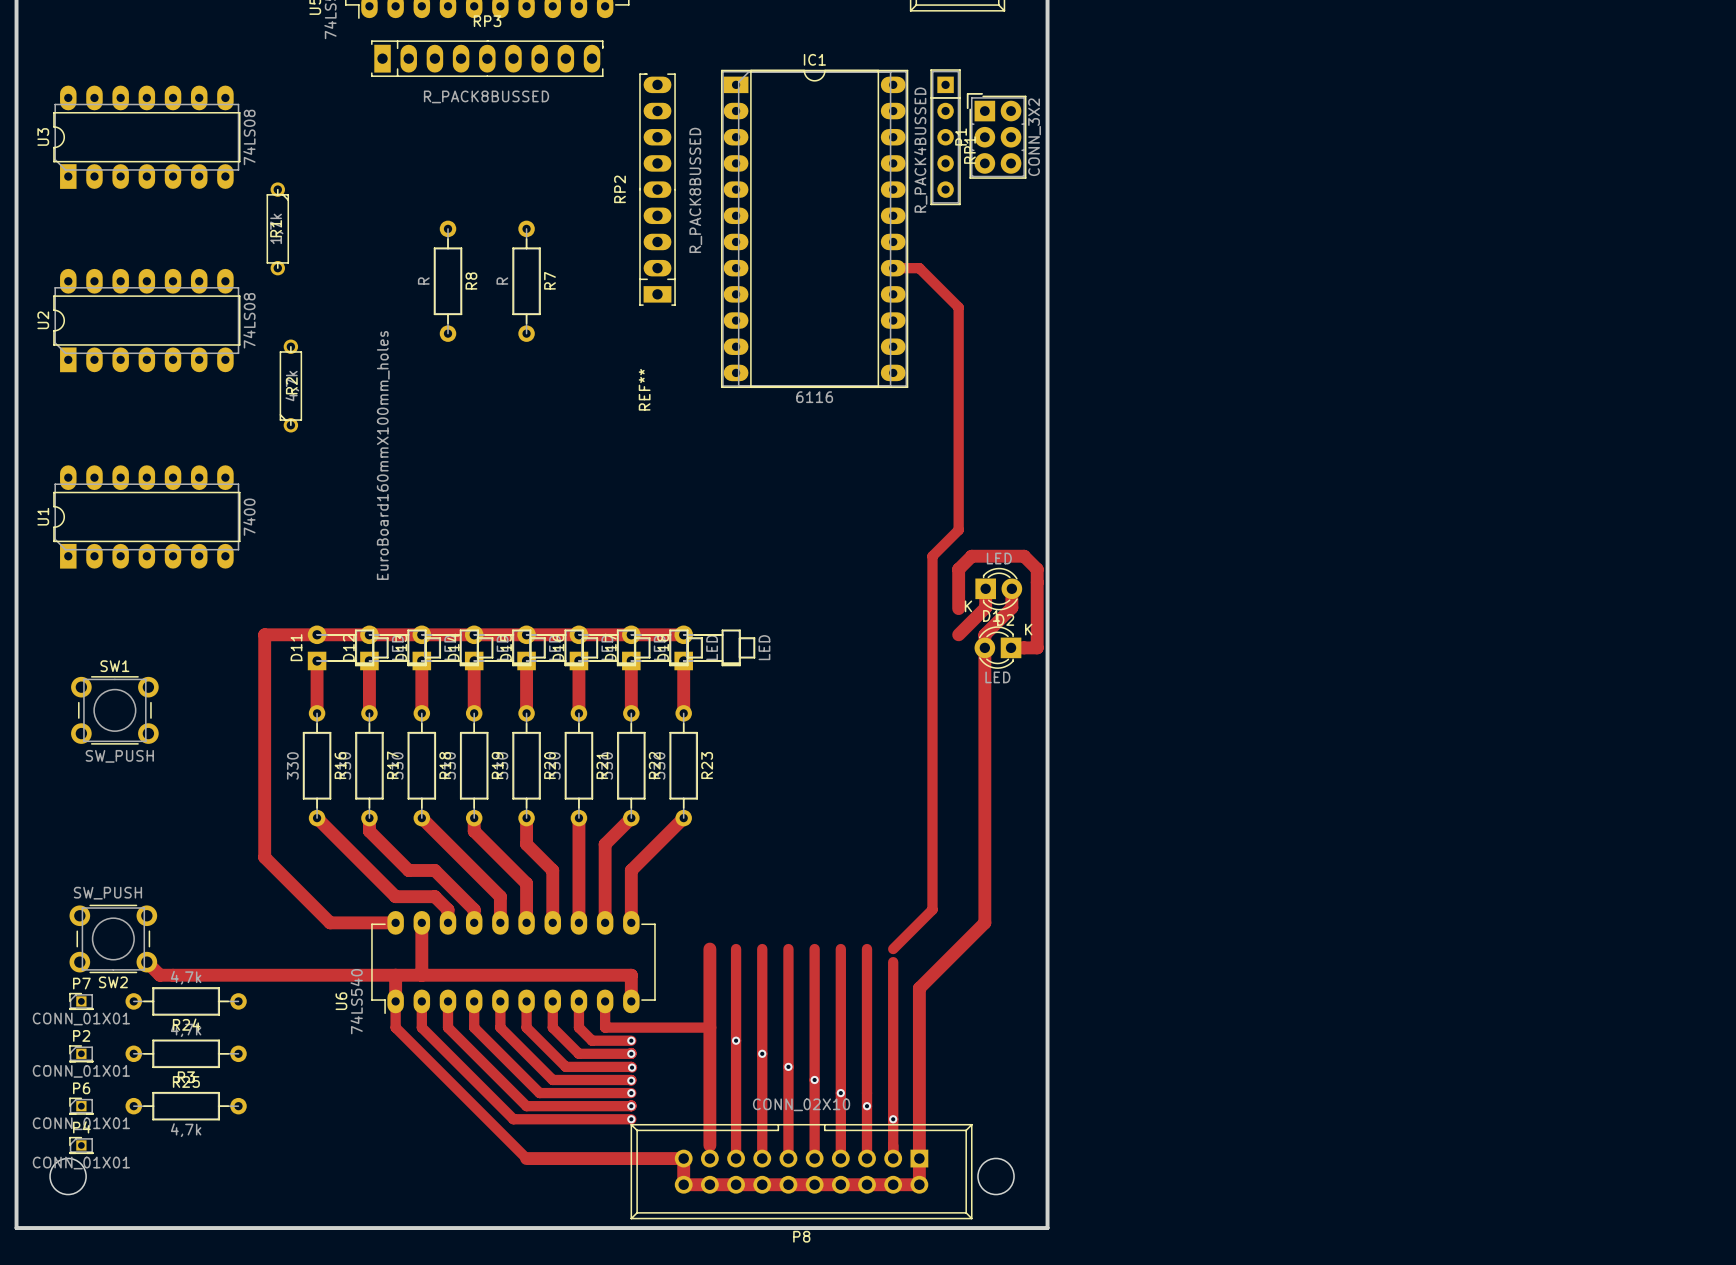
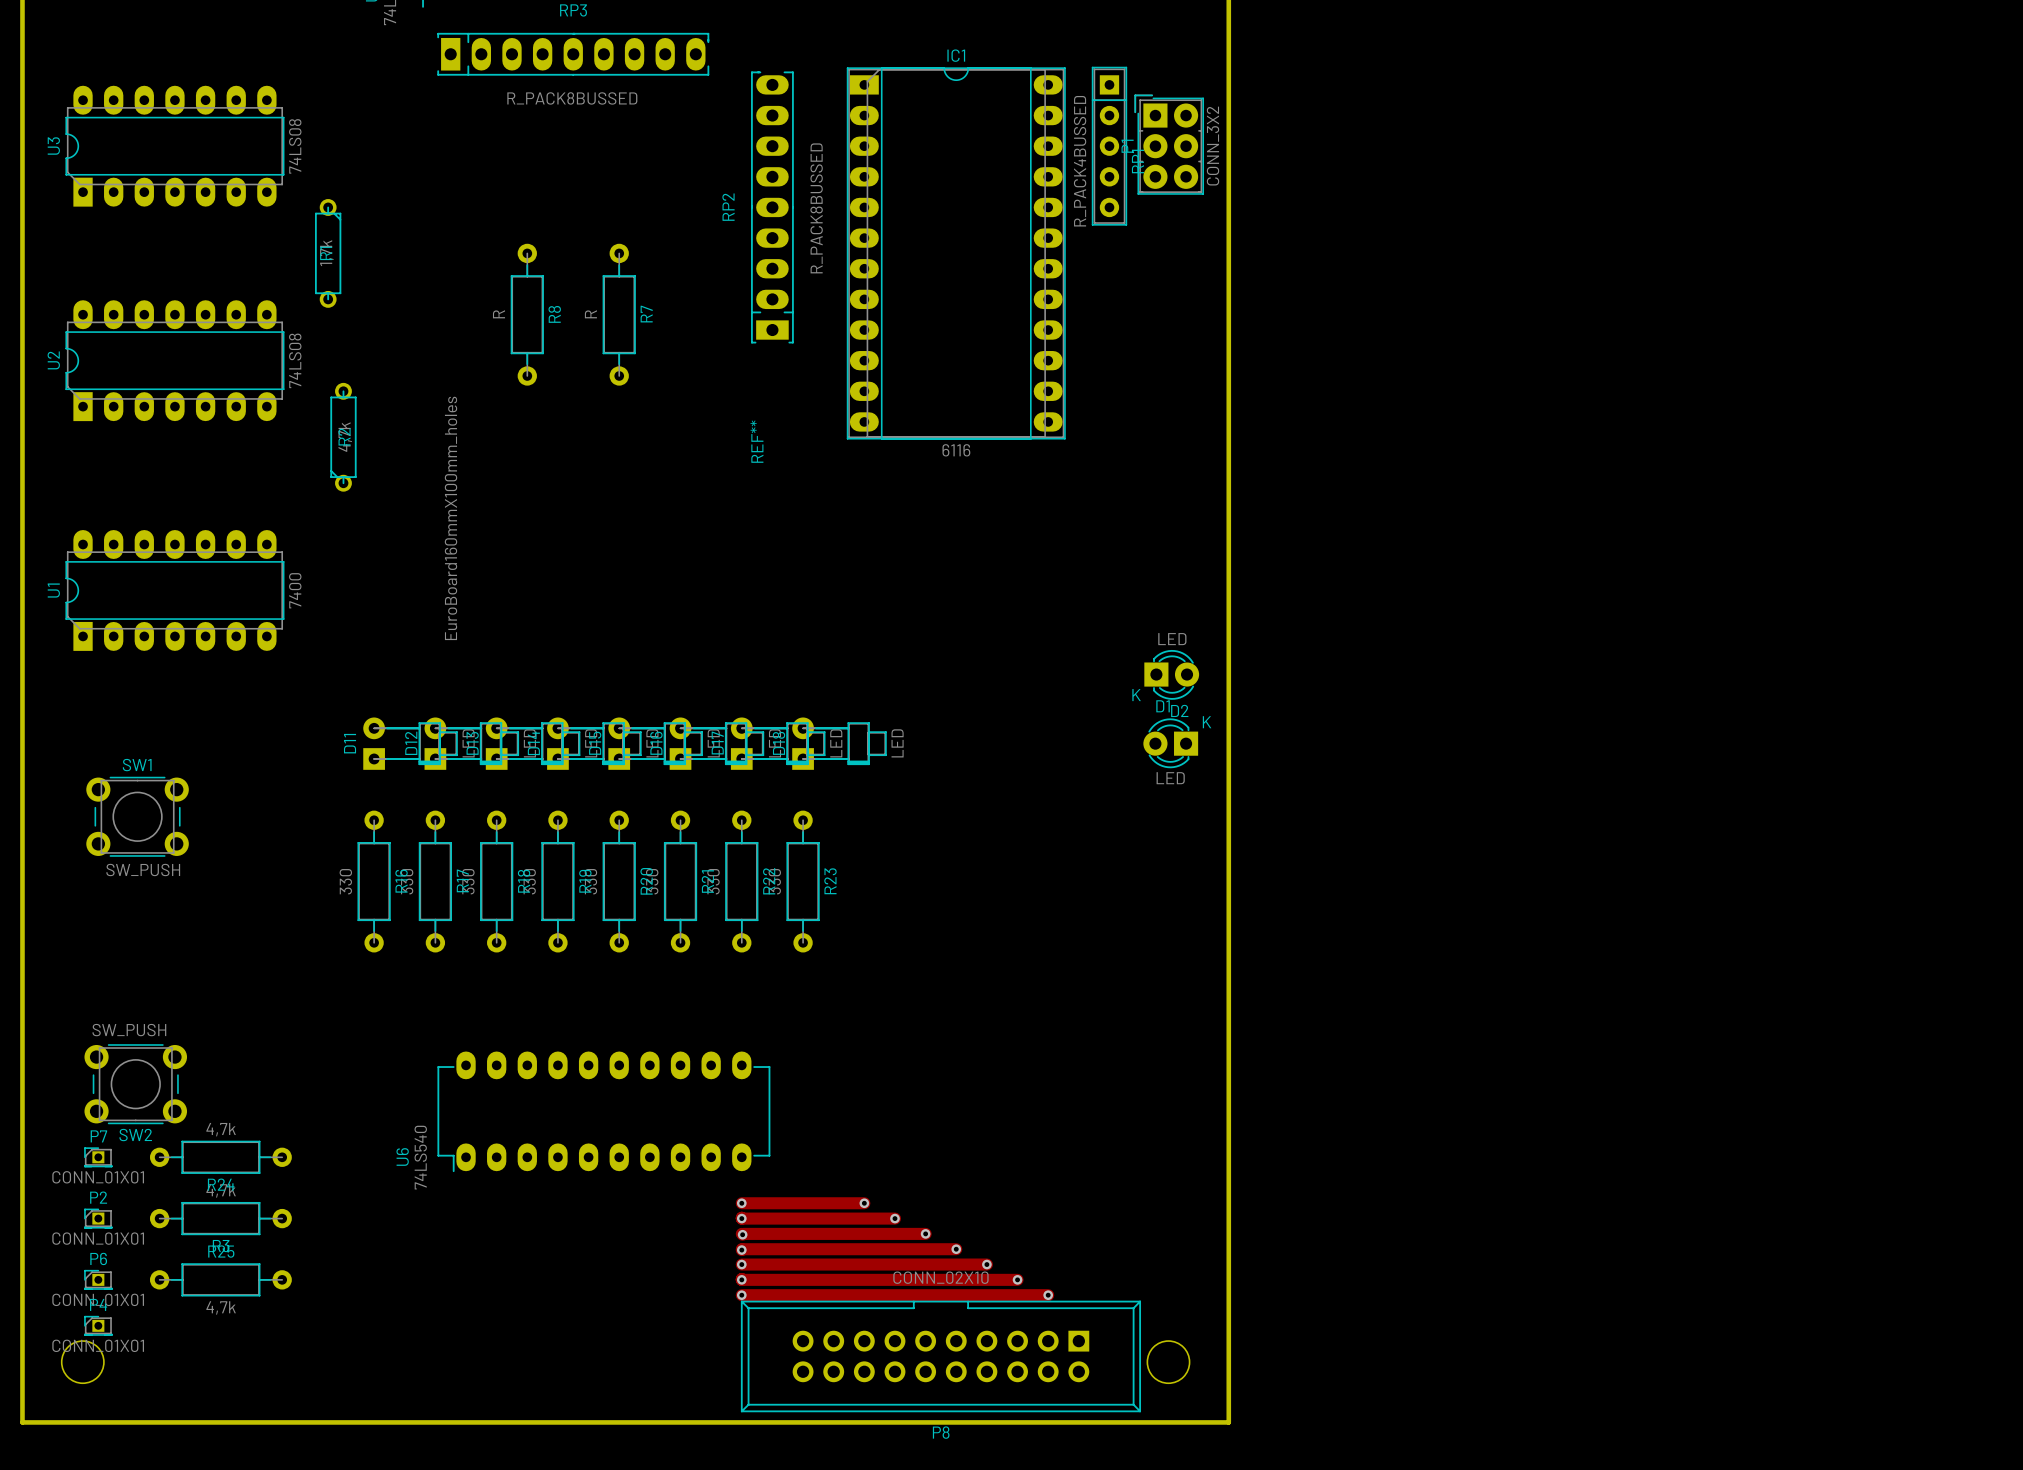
track: (893, 268) (919, 268) (958, 307) (958, 530) (932, 556) (932, 909) (893, 949) -> none
track: (985, 588) (985, 607) (958, 634) -> none
track: (1011, 588) (1011, 607) (984, 634) (984, 922) (919, 988) (919, 1184) (683, 1184) (683, 1158) (526, 1158) (395, 1027) (395, 975) -> none
track: (958, 608) (958, 569) (971, 556) (1024, 556) (1037, 569) (1037, 647) (1011, 647) -> none
track: (683, 634) (264, 634) (264, 857) (330, 922) (395, 922) -> none
track: (317, 660) (317, 713) -> none
track: (369, 660) (369, 713) -> none
track: (421, 660) (421, 713) -> none
track: (474, 660) (474, 713) -> none
track: (526, 660) (526, 713) -> none
track: (578, 660) (578, 713) -> none
track: (631, 660) (631, 713) -> none
track: (683, 660) (683, 713) -> none
track: (317, 818) (395, 896) (434, 896) (448, 909) (448, 922) -> none
track: (369, 818) (369, 831) (408, 870) (434, 870) (474, 909) (474, 922) -> none
track: (421, 818) (500, 896) (500, 922) -> none
track: (474, 818) (474, 831) (526, 883) (526, 922) -> none
track: (526, 818) (526, 844) (552, 870) (552, 922) -> none
track: (578, 818) (578, 922) -> none
track: (631, 818) (605, 844) (605, 922) -> none
track: (683, 818) (631, 870) (631, 922) -> none
track: (421, 922) (421, 975) -> none
track: (709, 949) (709, 1145) -> none
track: (736, 949) (736, 1158) -> none
track: (762, 949) (762, 1158) -> none
track: (788, 949) (788, 1158) -> none
track: (814, 949) (814, 1158) -> none
track: (840, 949) (840, 1158) -> none
track: (867, 949) (867, 1158) -> none
track: (146, 962) (159, 975) (631, 975) (631, 1001) -> none
track: (893, 962) (893, 1158) -> none
track: (421, 1001) (421, 1027) (513, 1119) (631, 1119) -> (1048, 1295) (741, 1295)
track: (448, 1001) (448, 1027) (526, 1106) (631, 1106) -> (1017, 1279) (741, 1279)
track: (474, 1001) (474, 1027) (539, 1093) (631, 1093) -> (986, 1264) (741, 1264)
track: (500, 1001) (500, 1027) (552, 1079) (631, 1079) -> none
track: (526, 1001) (526, 1027) (565, 1066) (631, 1066) -> none
track: (552, 1001) (552, 1027) (578, 1053) (631, 1053) -> (894, 1218) (741, 1218)
track: (578, 1001) (578, 1027) (592, 1040) (631, 1040) -> (864, 1203) (741, 1203)
track: (605, 1001) (605, 1027) (709, 1027) -> none
track: none -> (743, 1233) (925, 1233)
track: none -> (742, 1249) (956, 1249)

